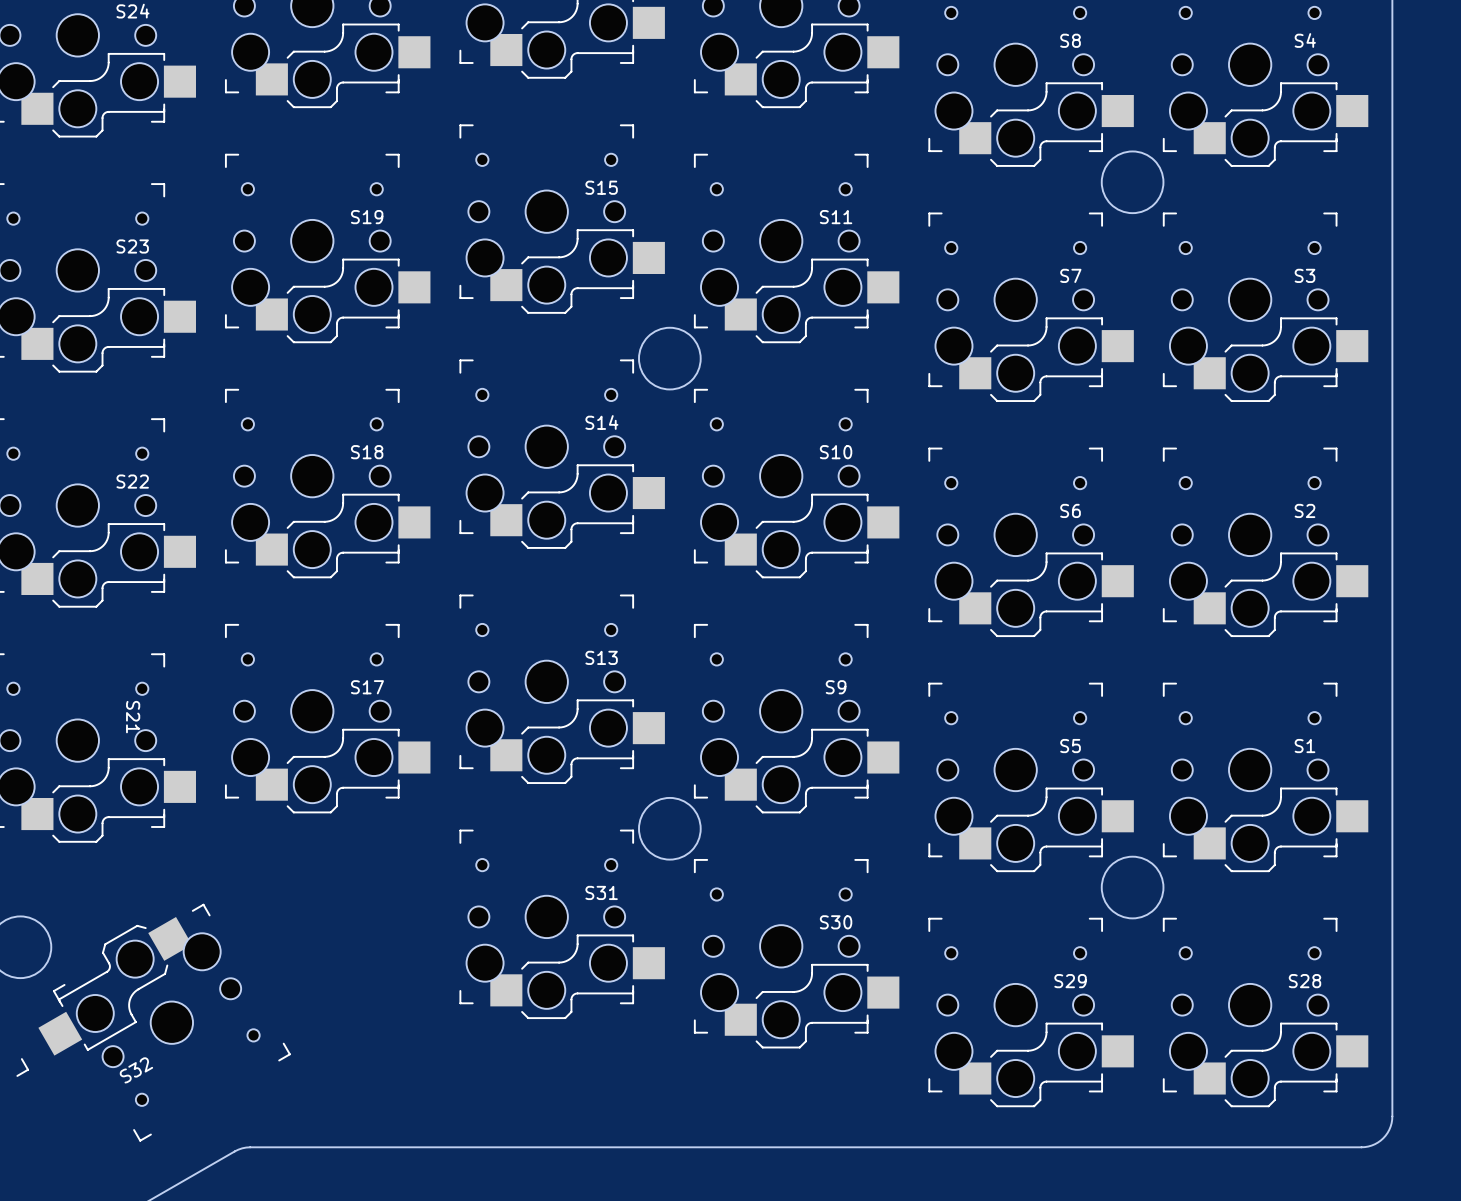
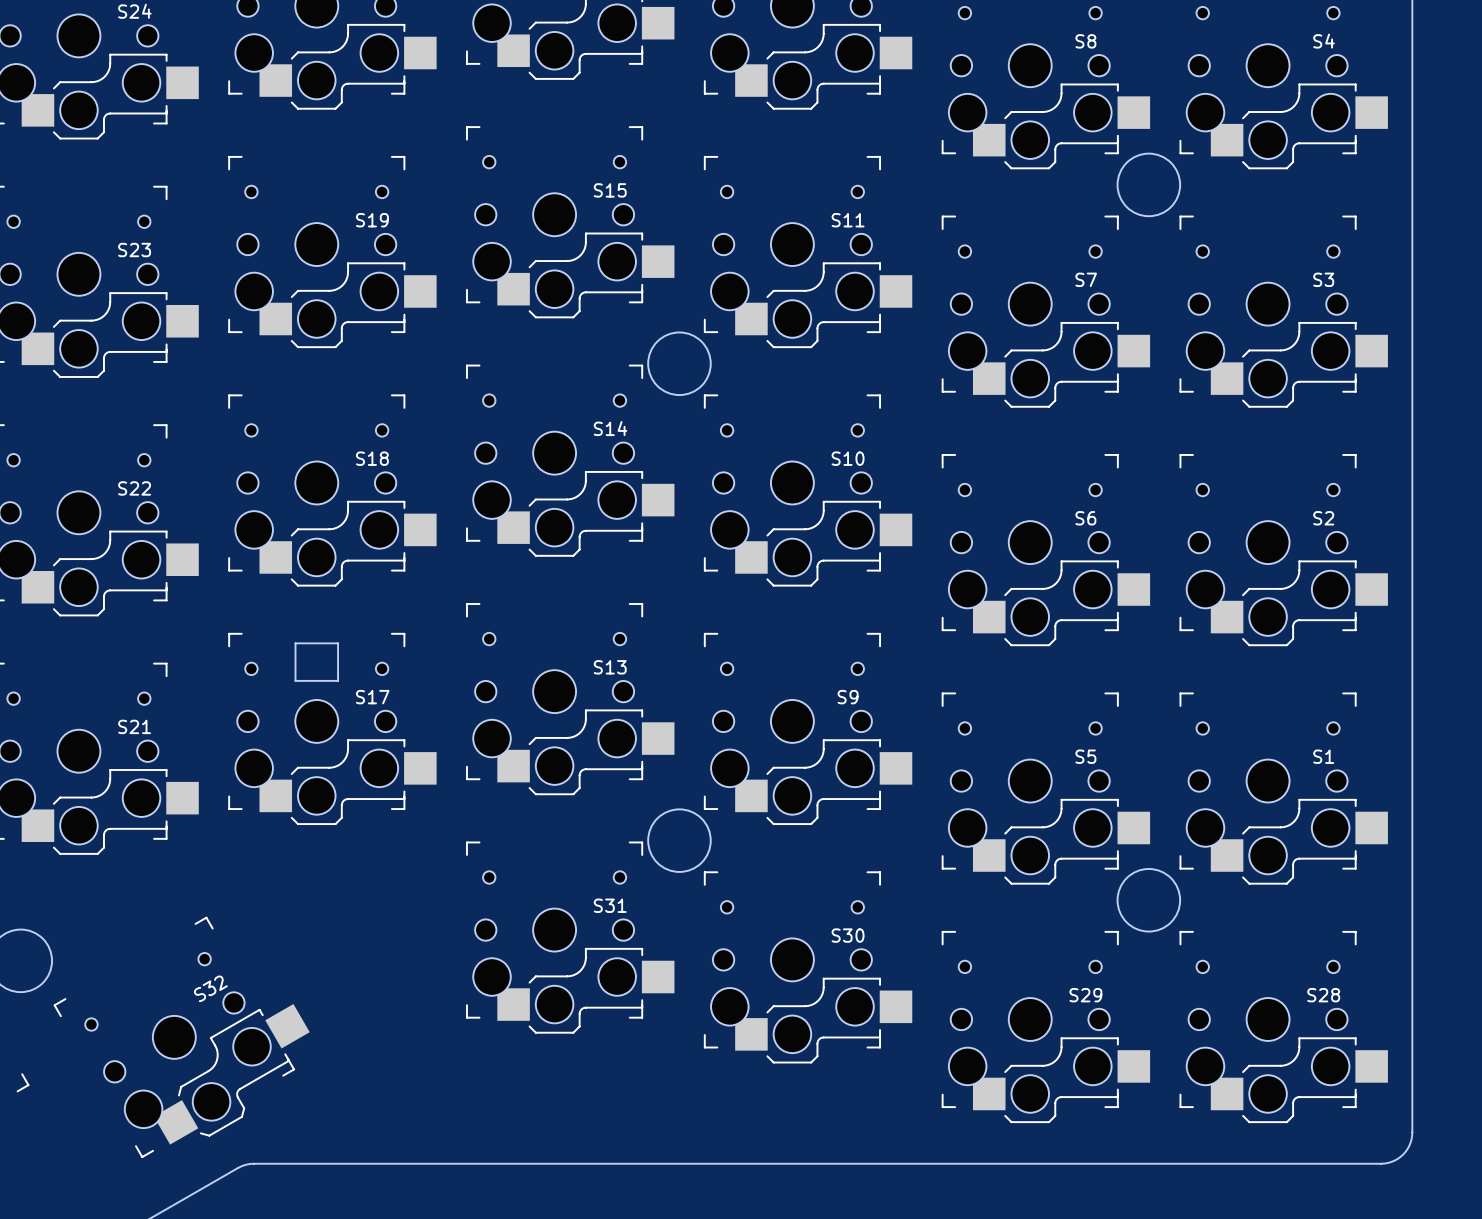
part: none -> (316, 662)
S21 name rotation: 0° (133, 717) -> 90° counterclockwise (134, 726)
S32 rotation: 0° (164, 1022) -> 180° (181, 1037)

